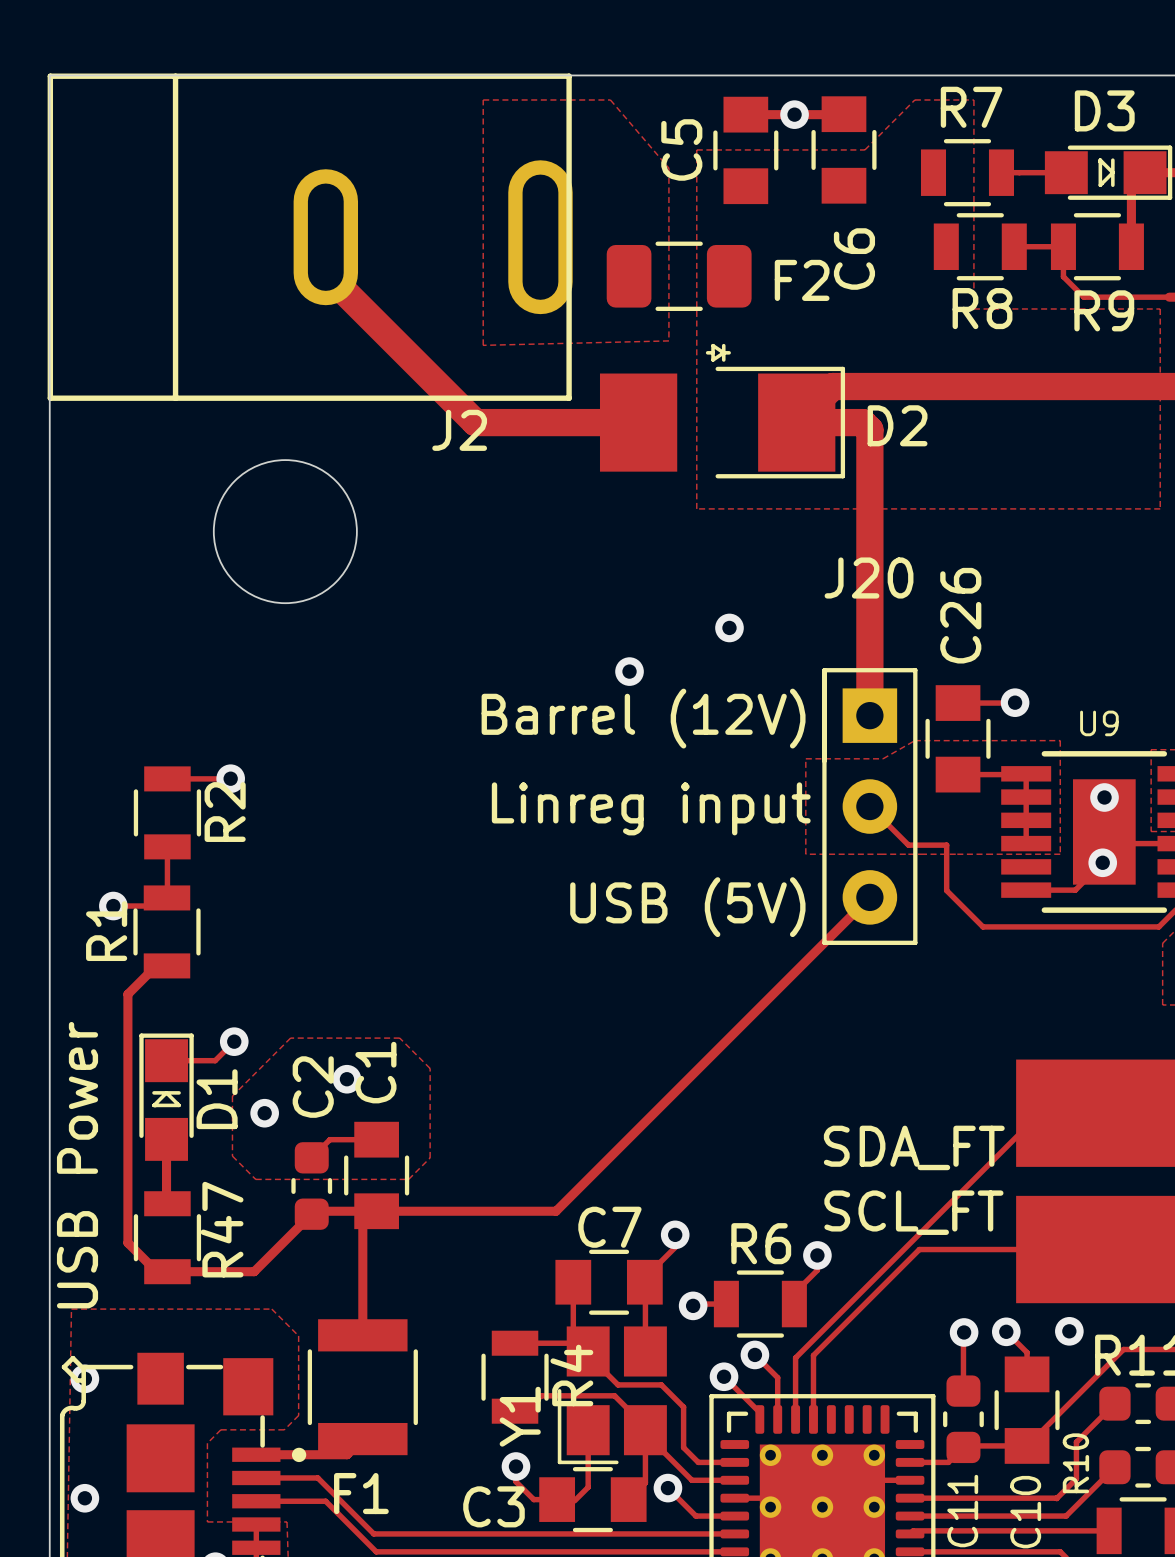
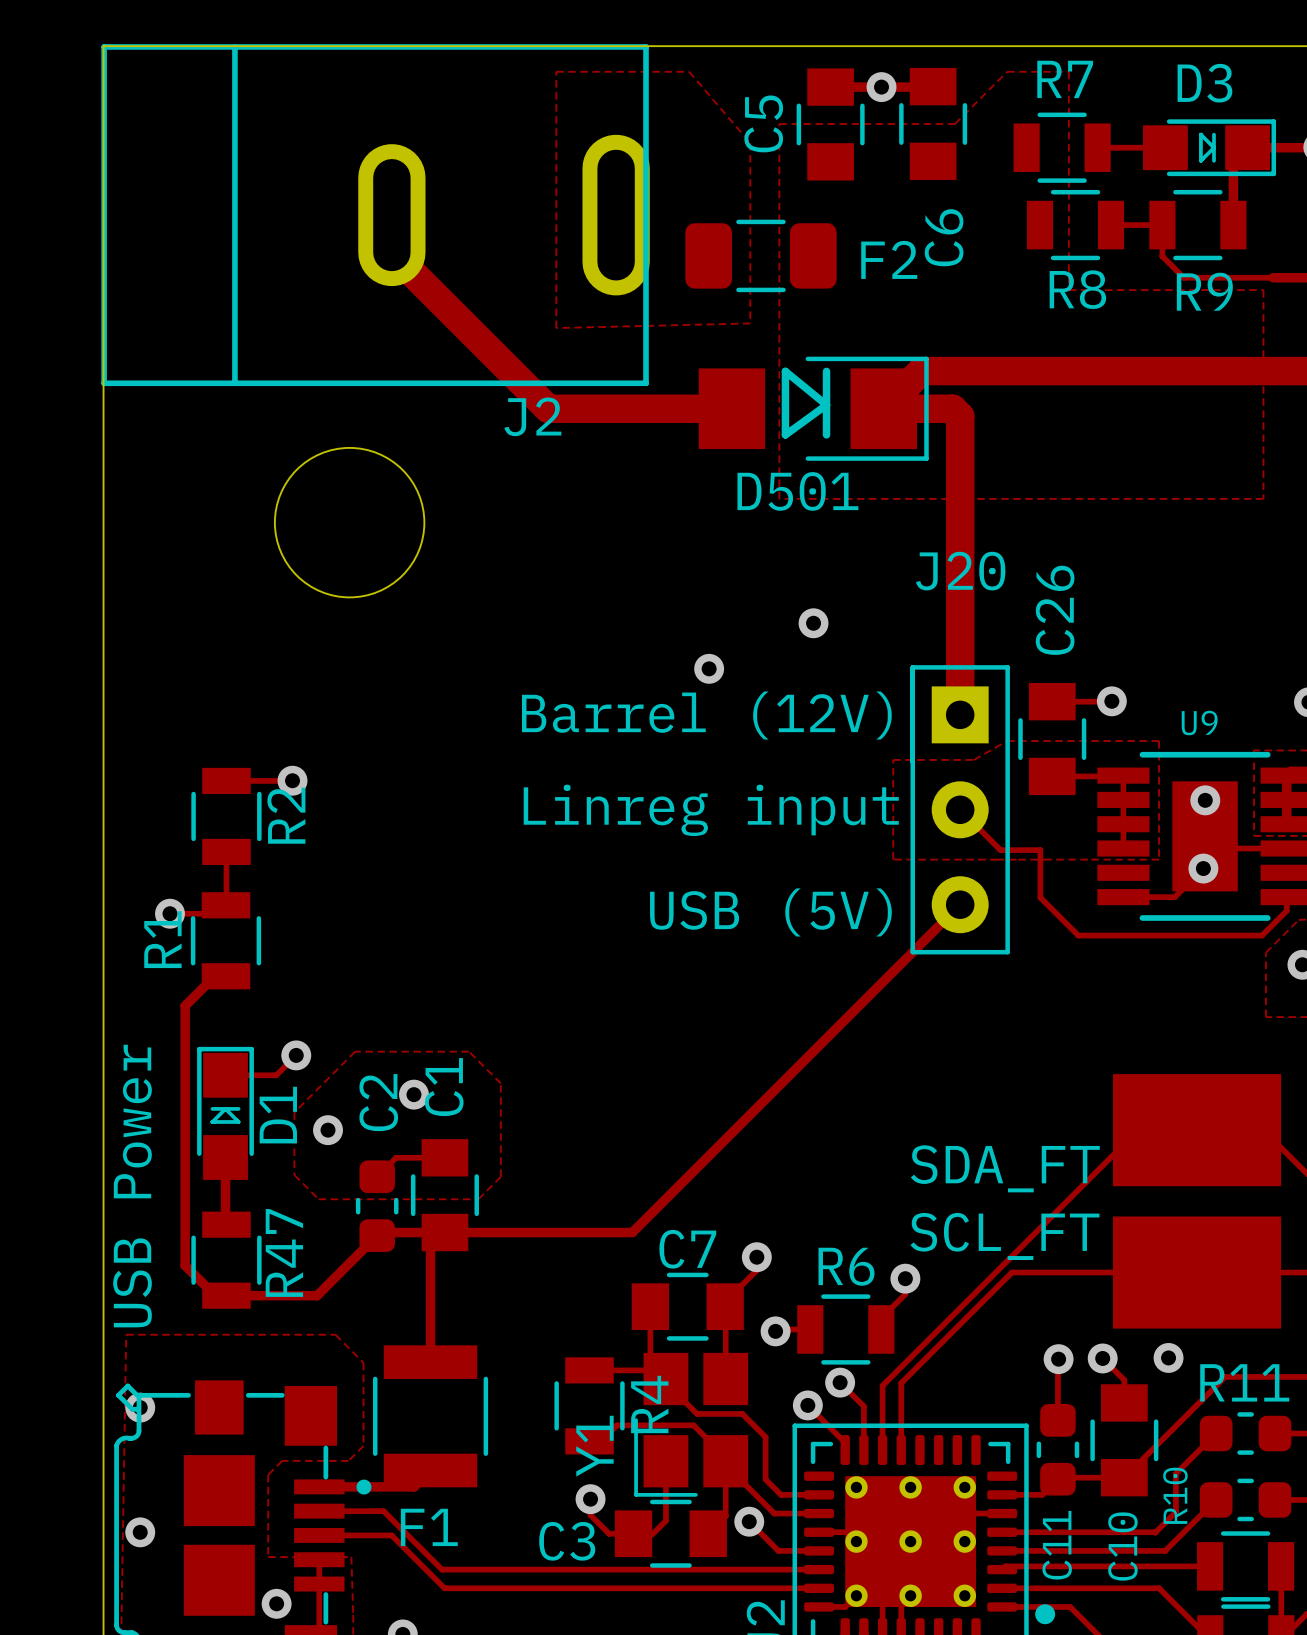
D2: (722, 411) -> none
D501: none -> (813, 408)

